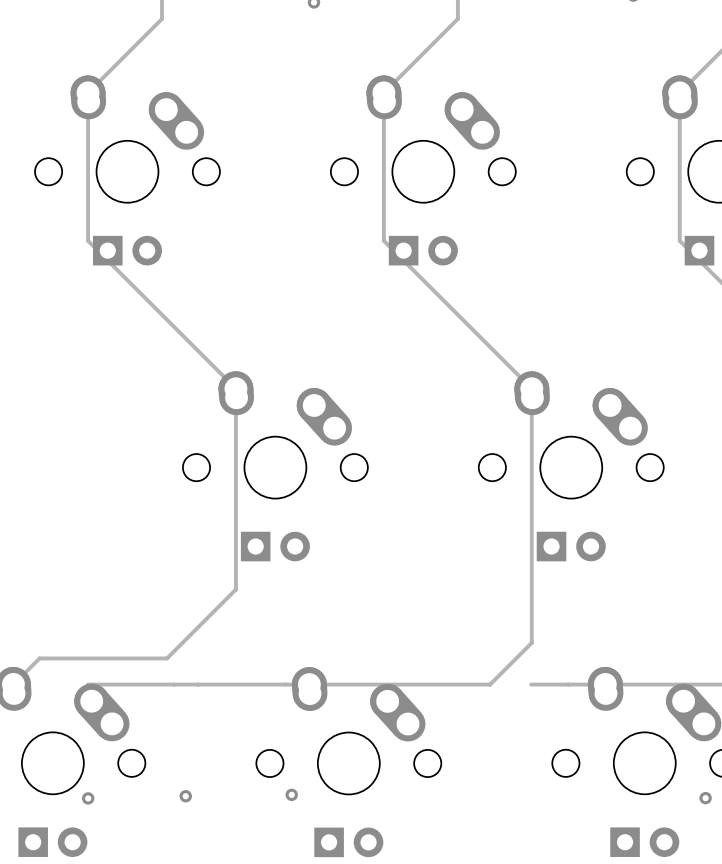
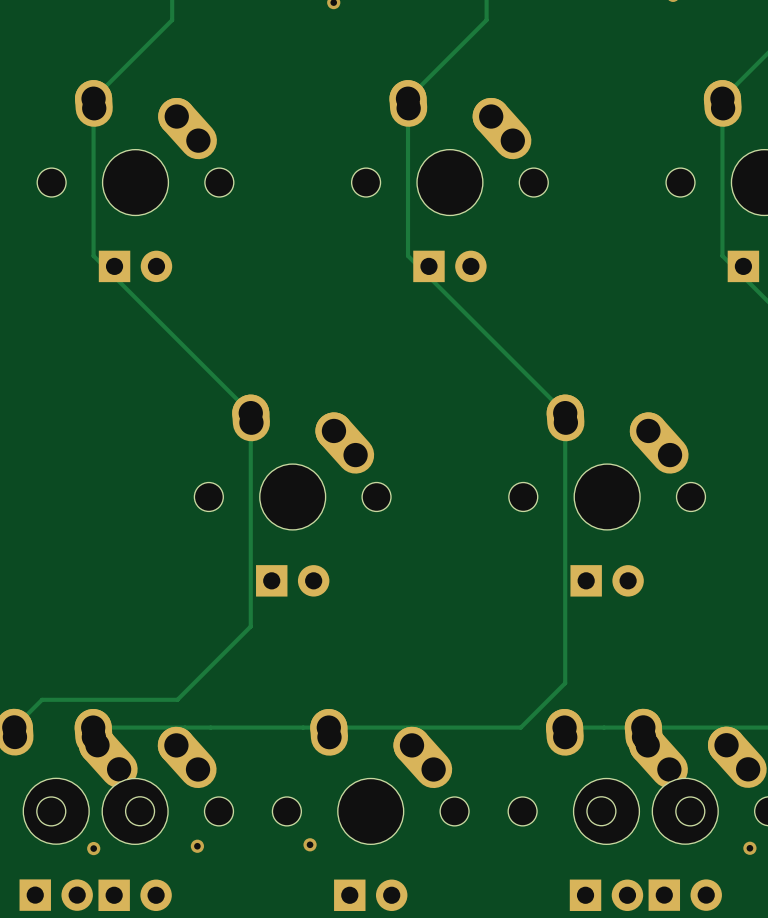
part: none -> (135, 810)
part: none -> (606, 810)

